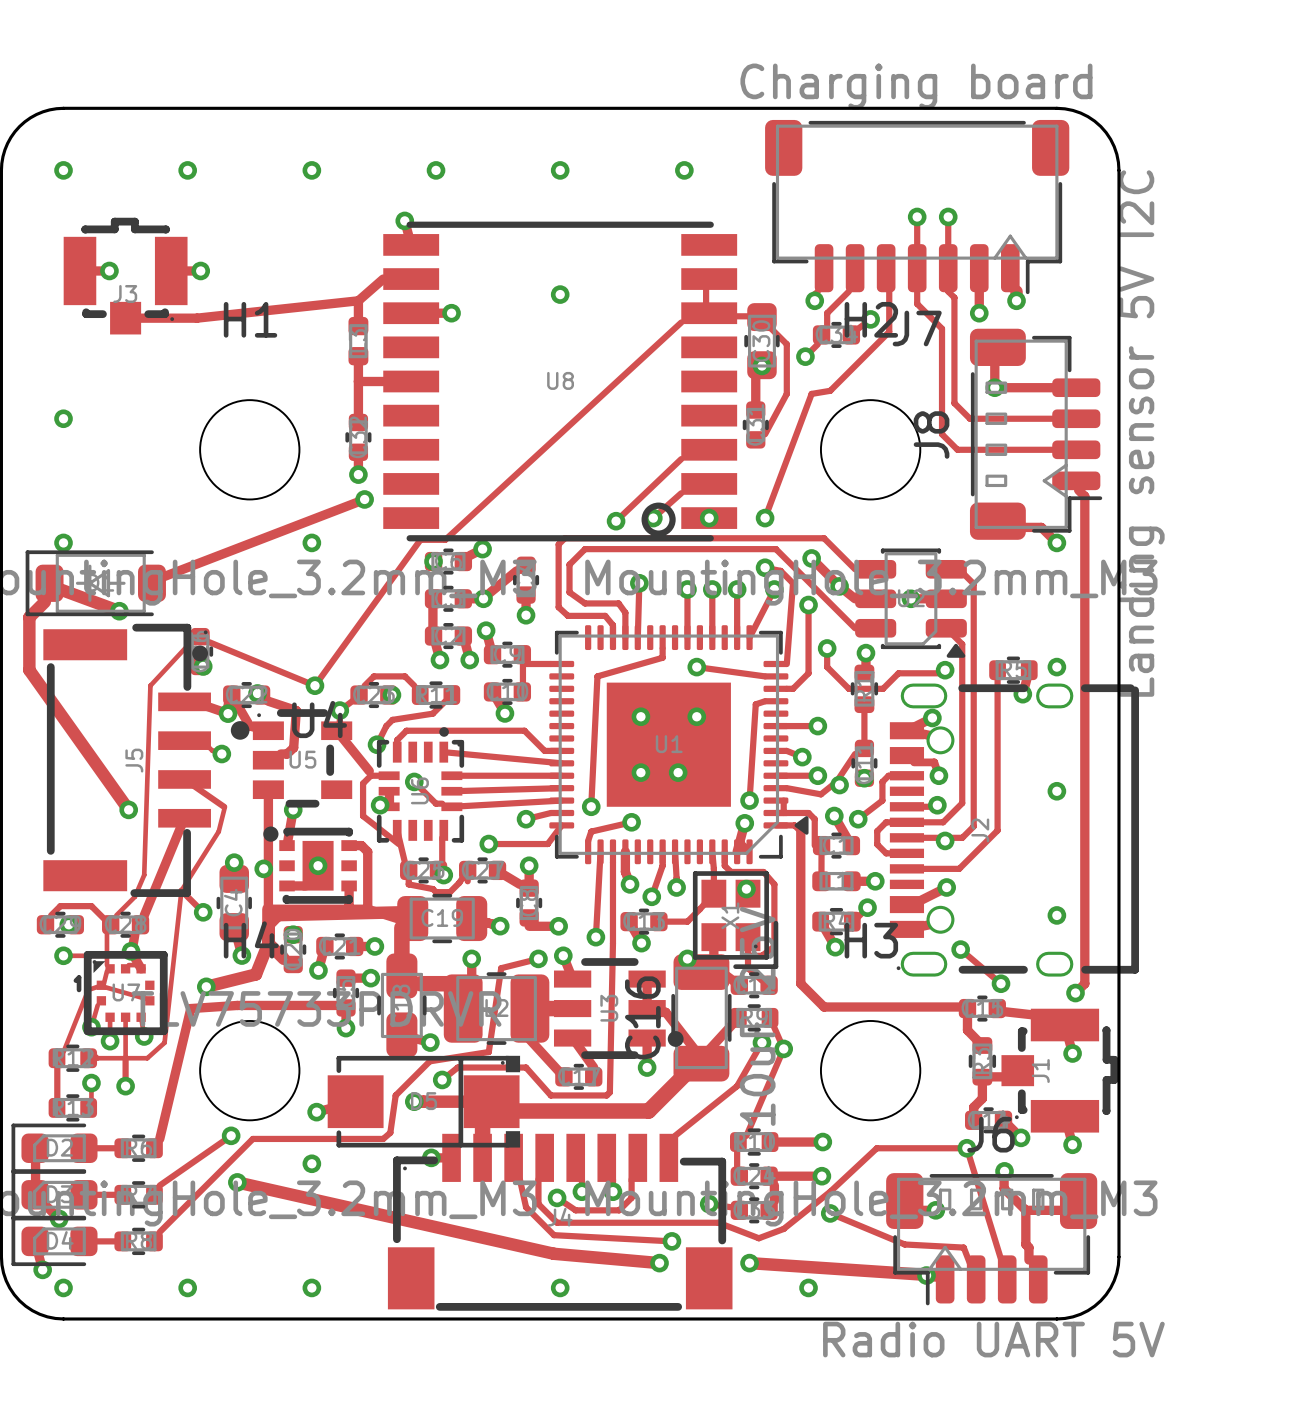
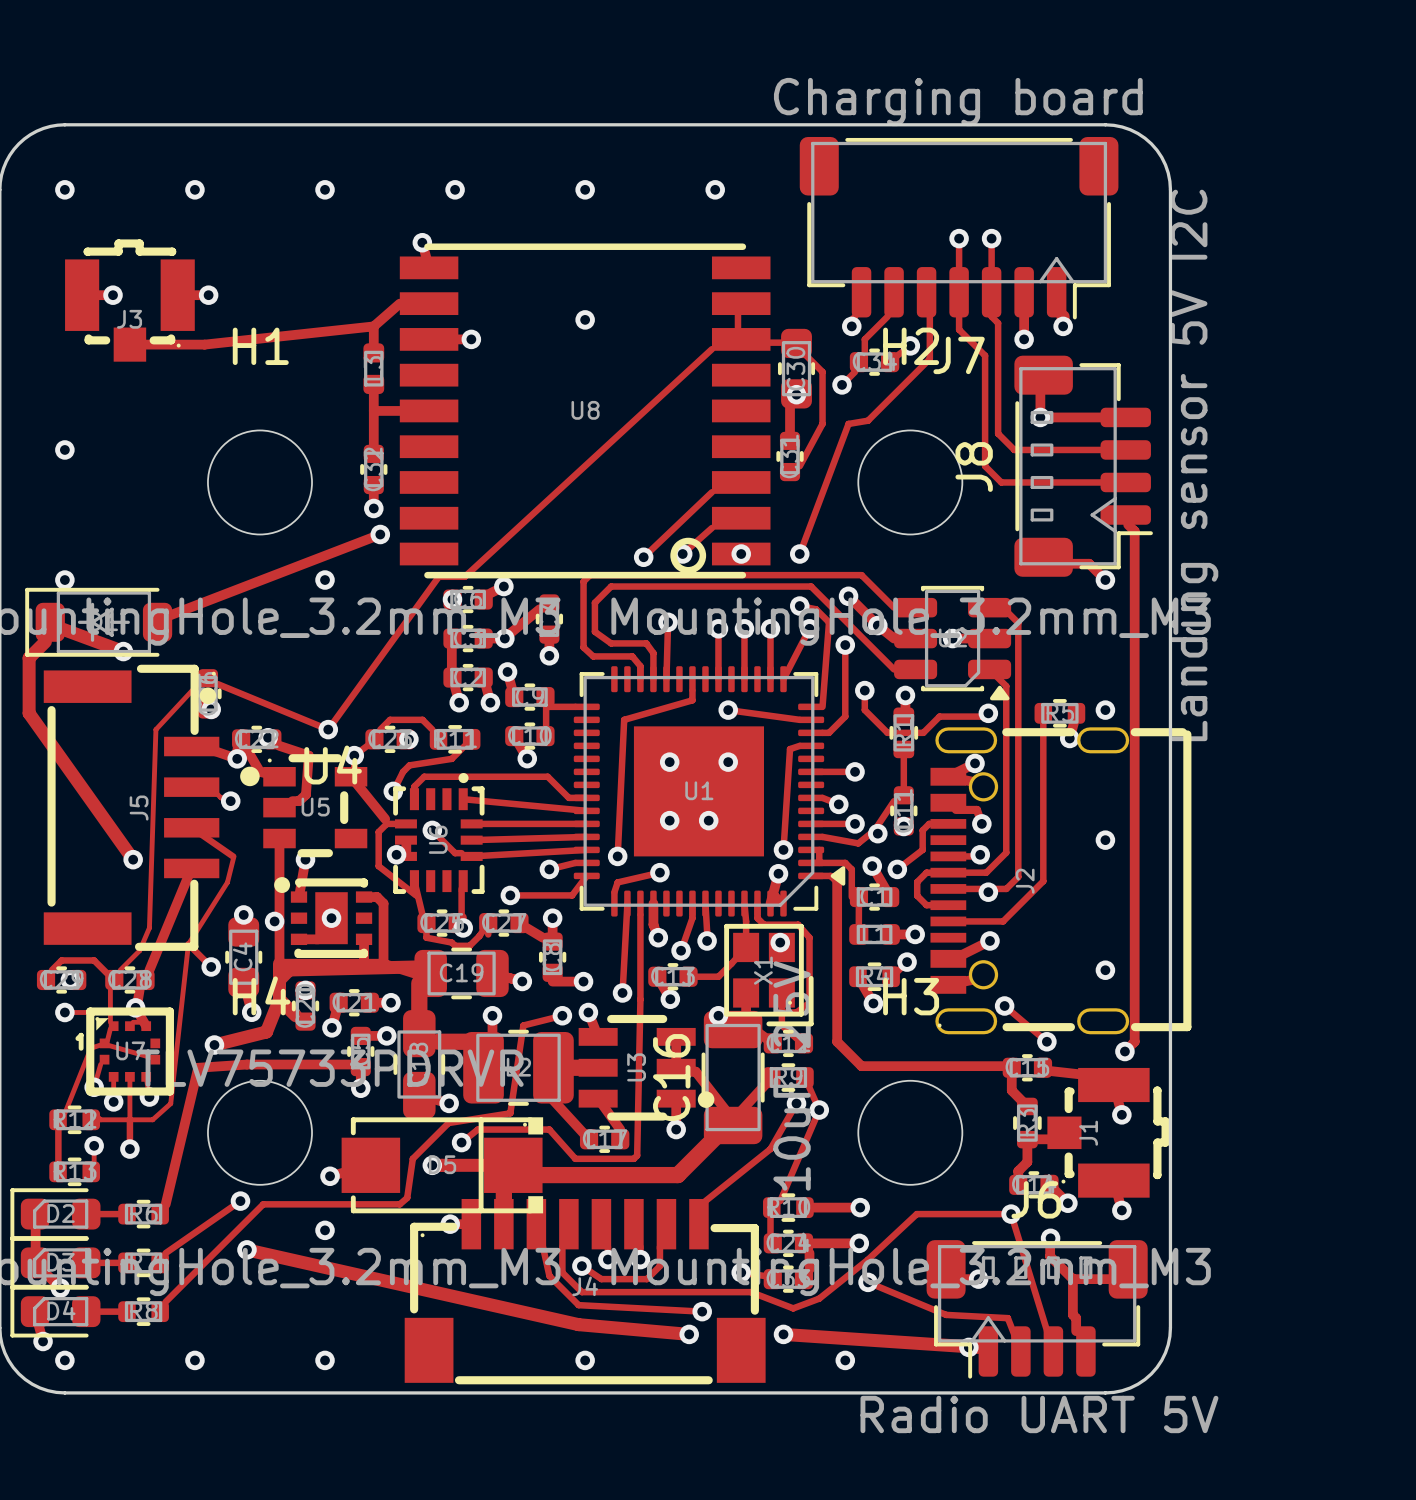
J2 footprint: [889, 683, 1139, 977] -> [930, 727, 1192, 1035]

